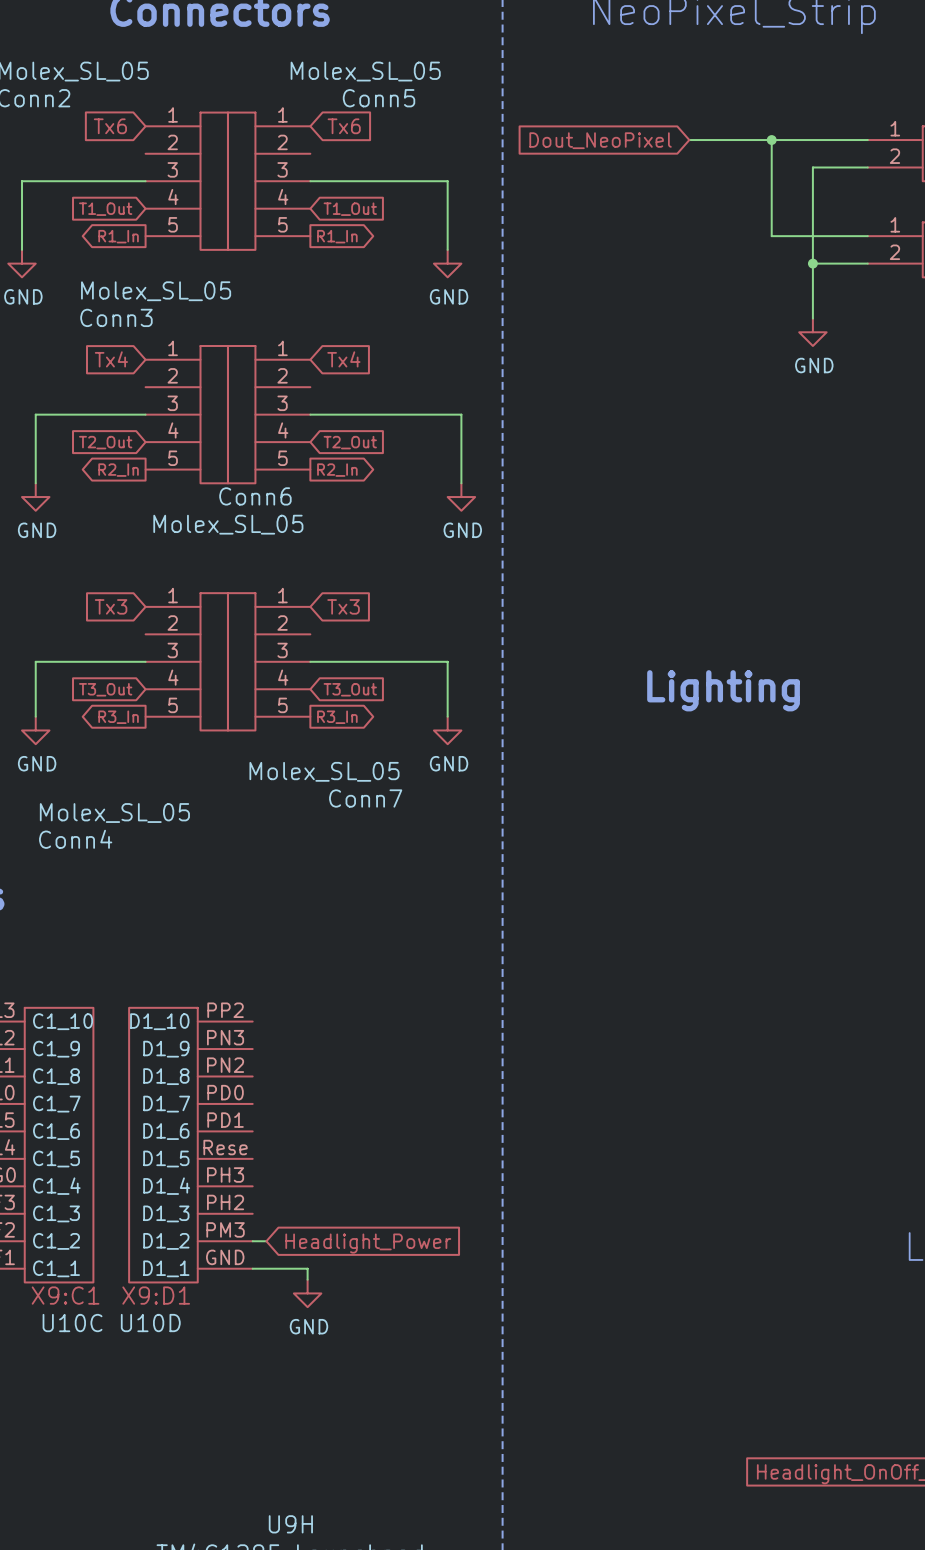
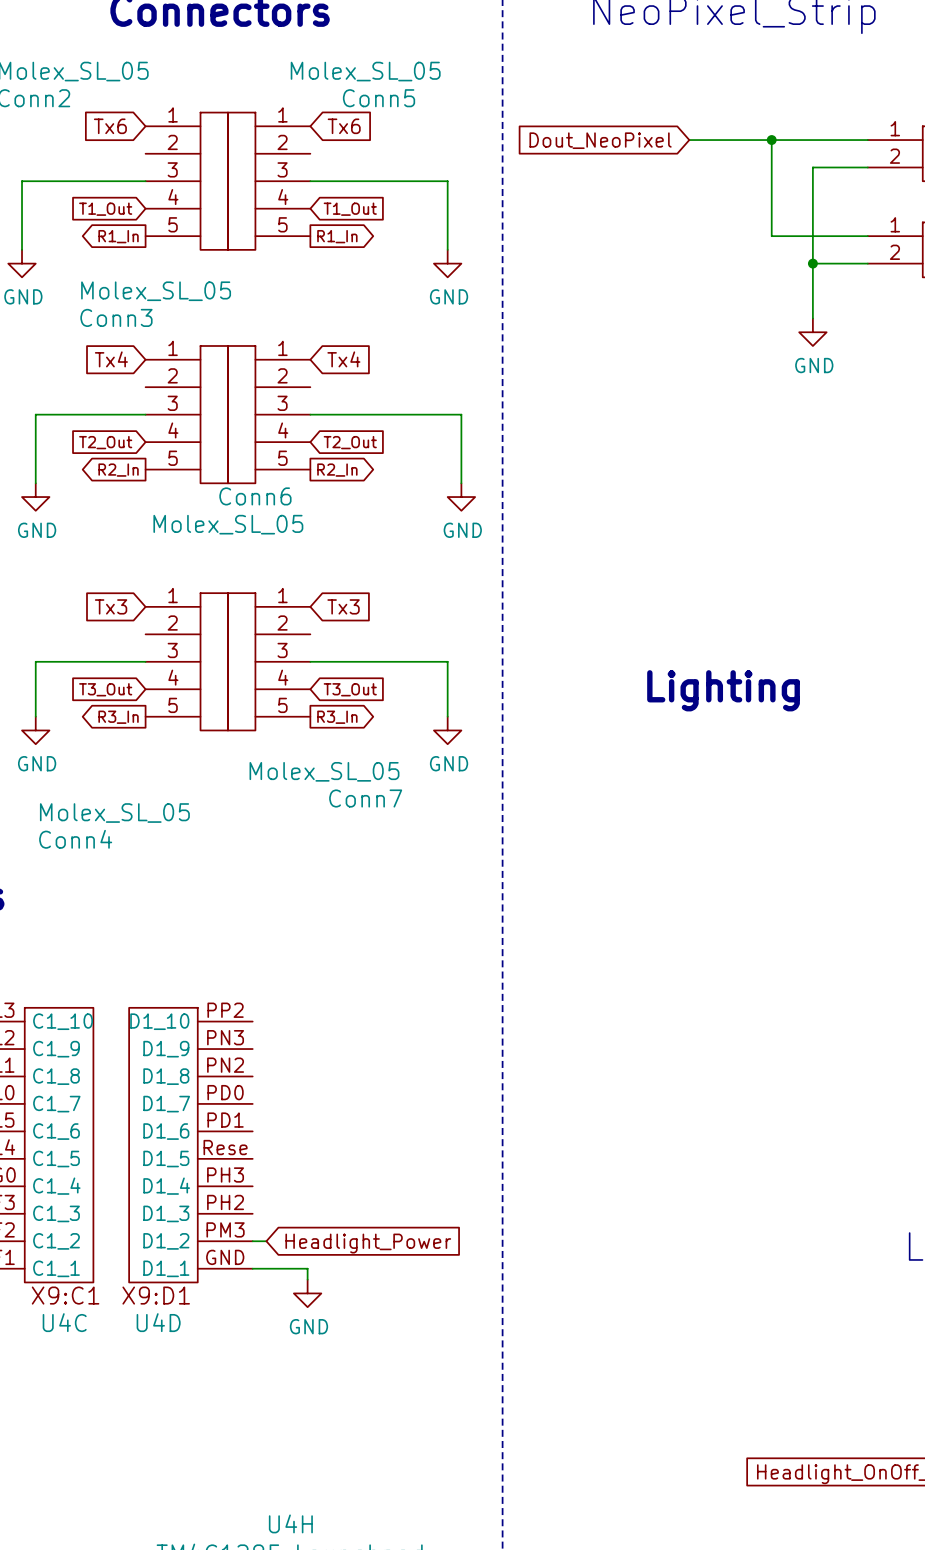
U10C name: U10C (72, 1323) -> U4C (64, 1322)
U10D name: U10D (150, 1323) -> U4D (158, 1322)
U9H name: U9H (290, 1524) -> U4H (290, 1523)

